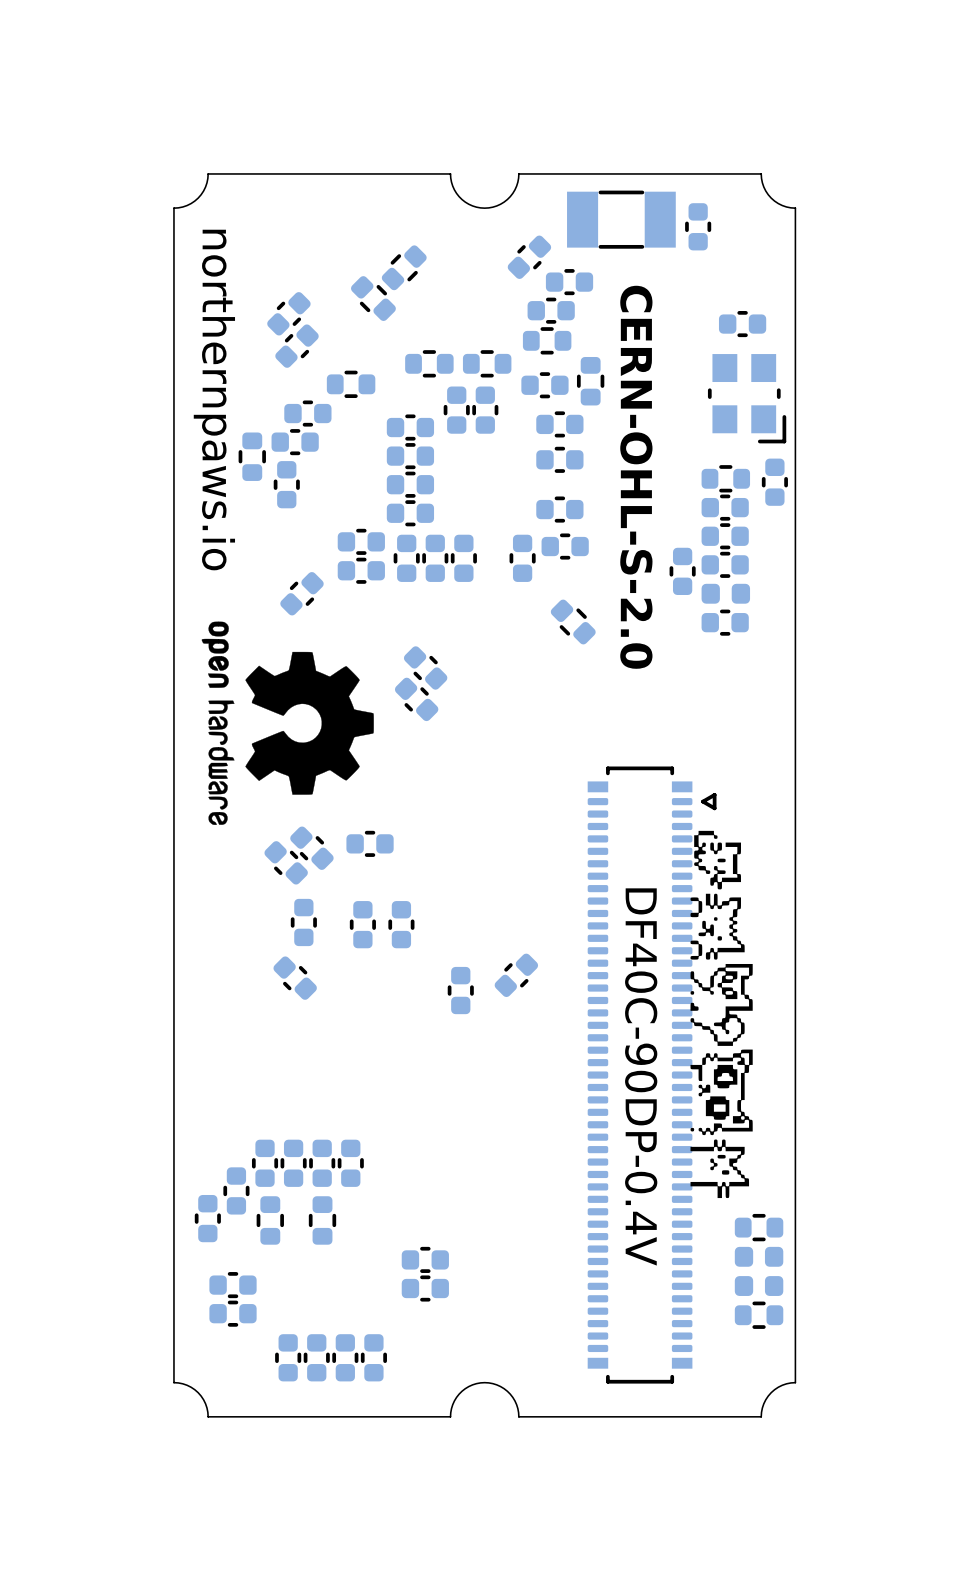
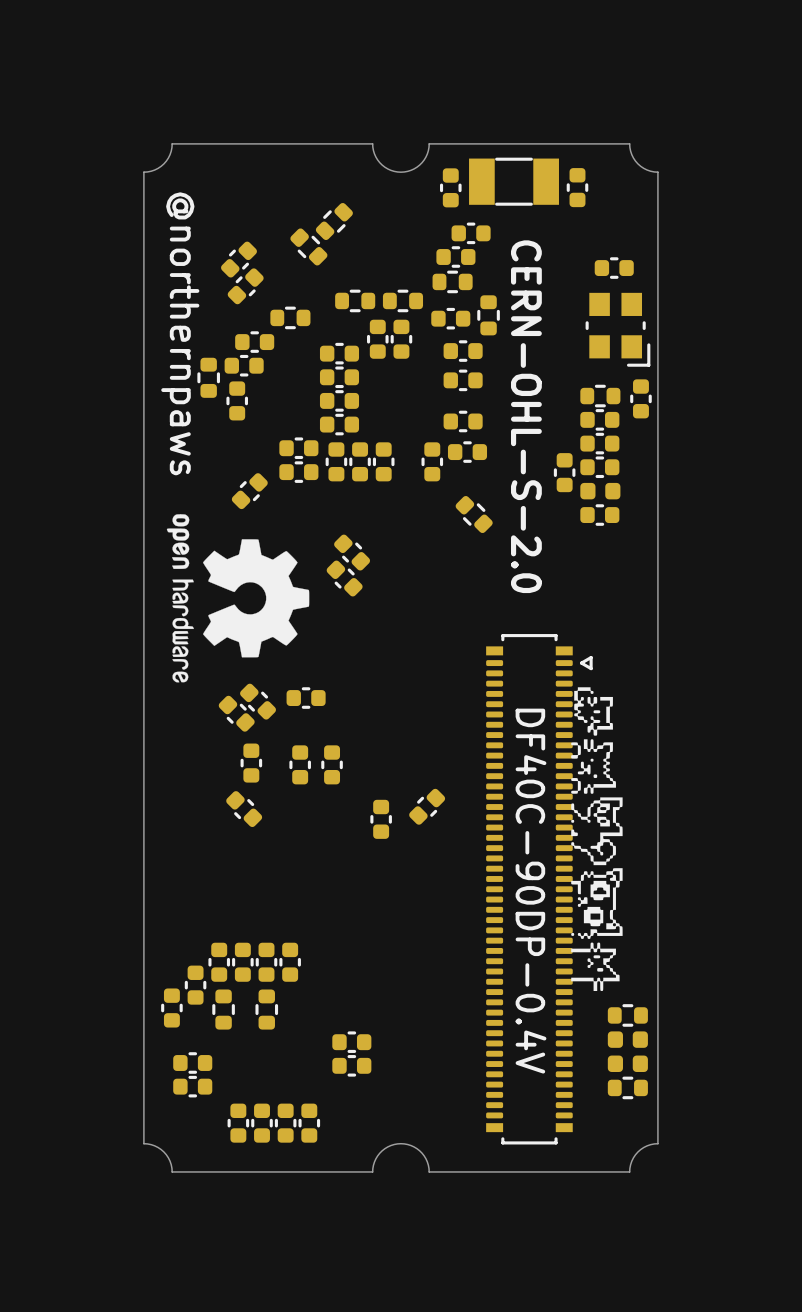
part: none -> (450, 187)
part: (529, 257) -> none
text: northernpaws.io (214, 400) -> @northernpaws (180, 333)

